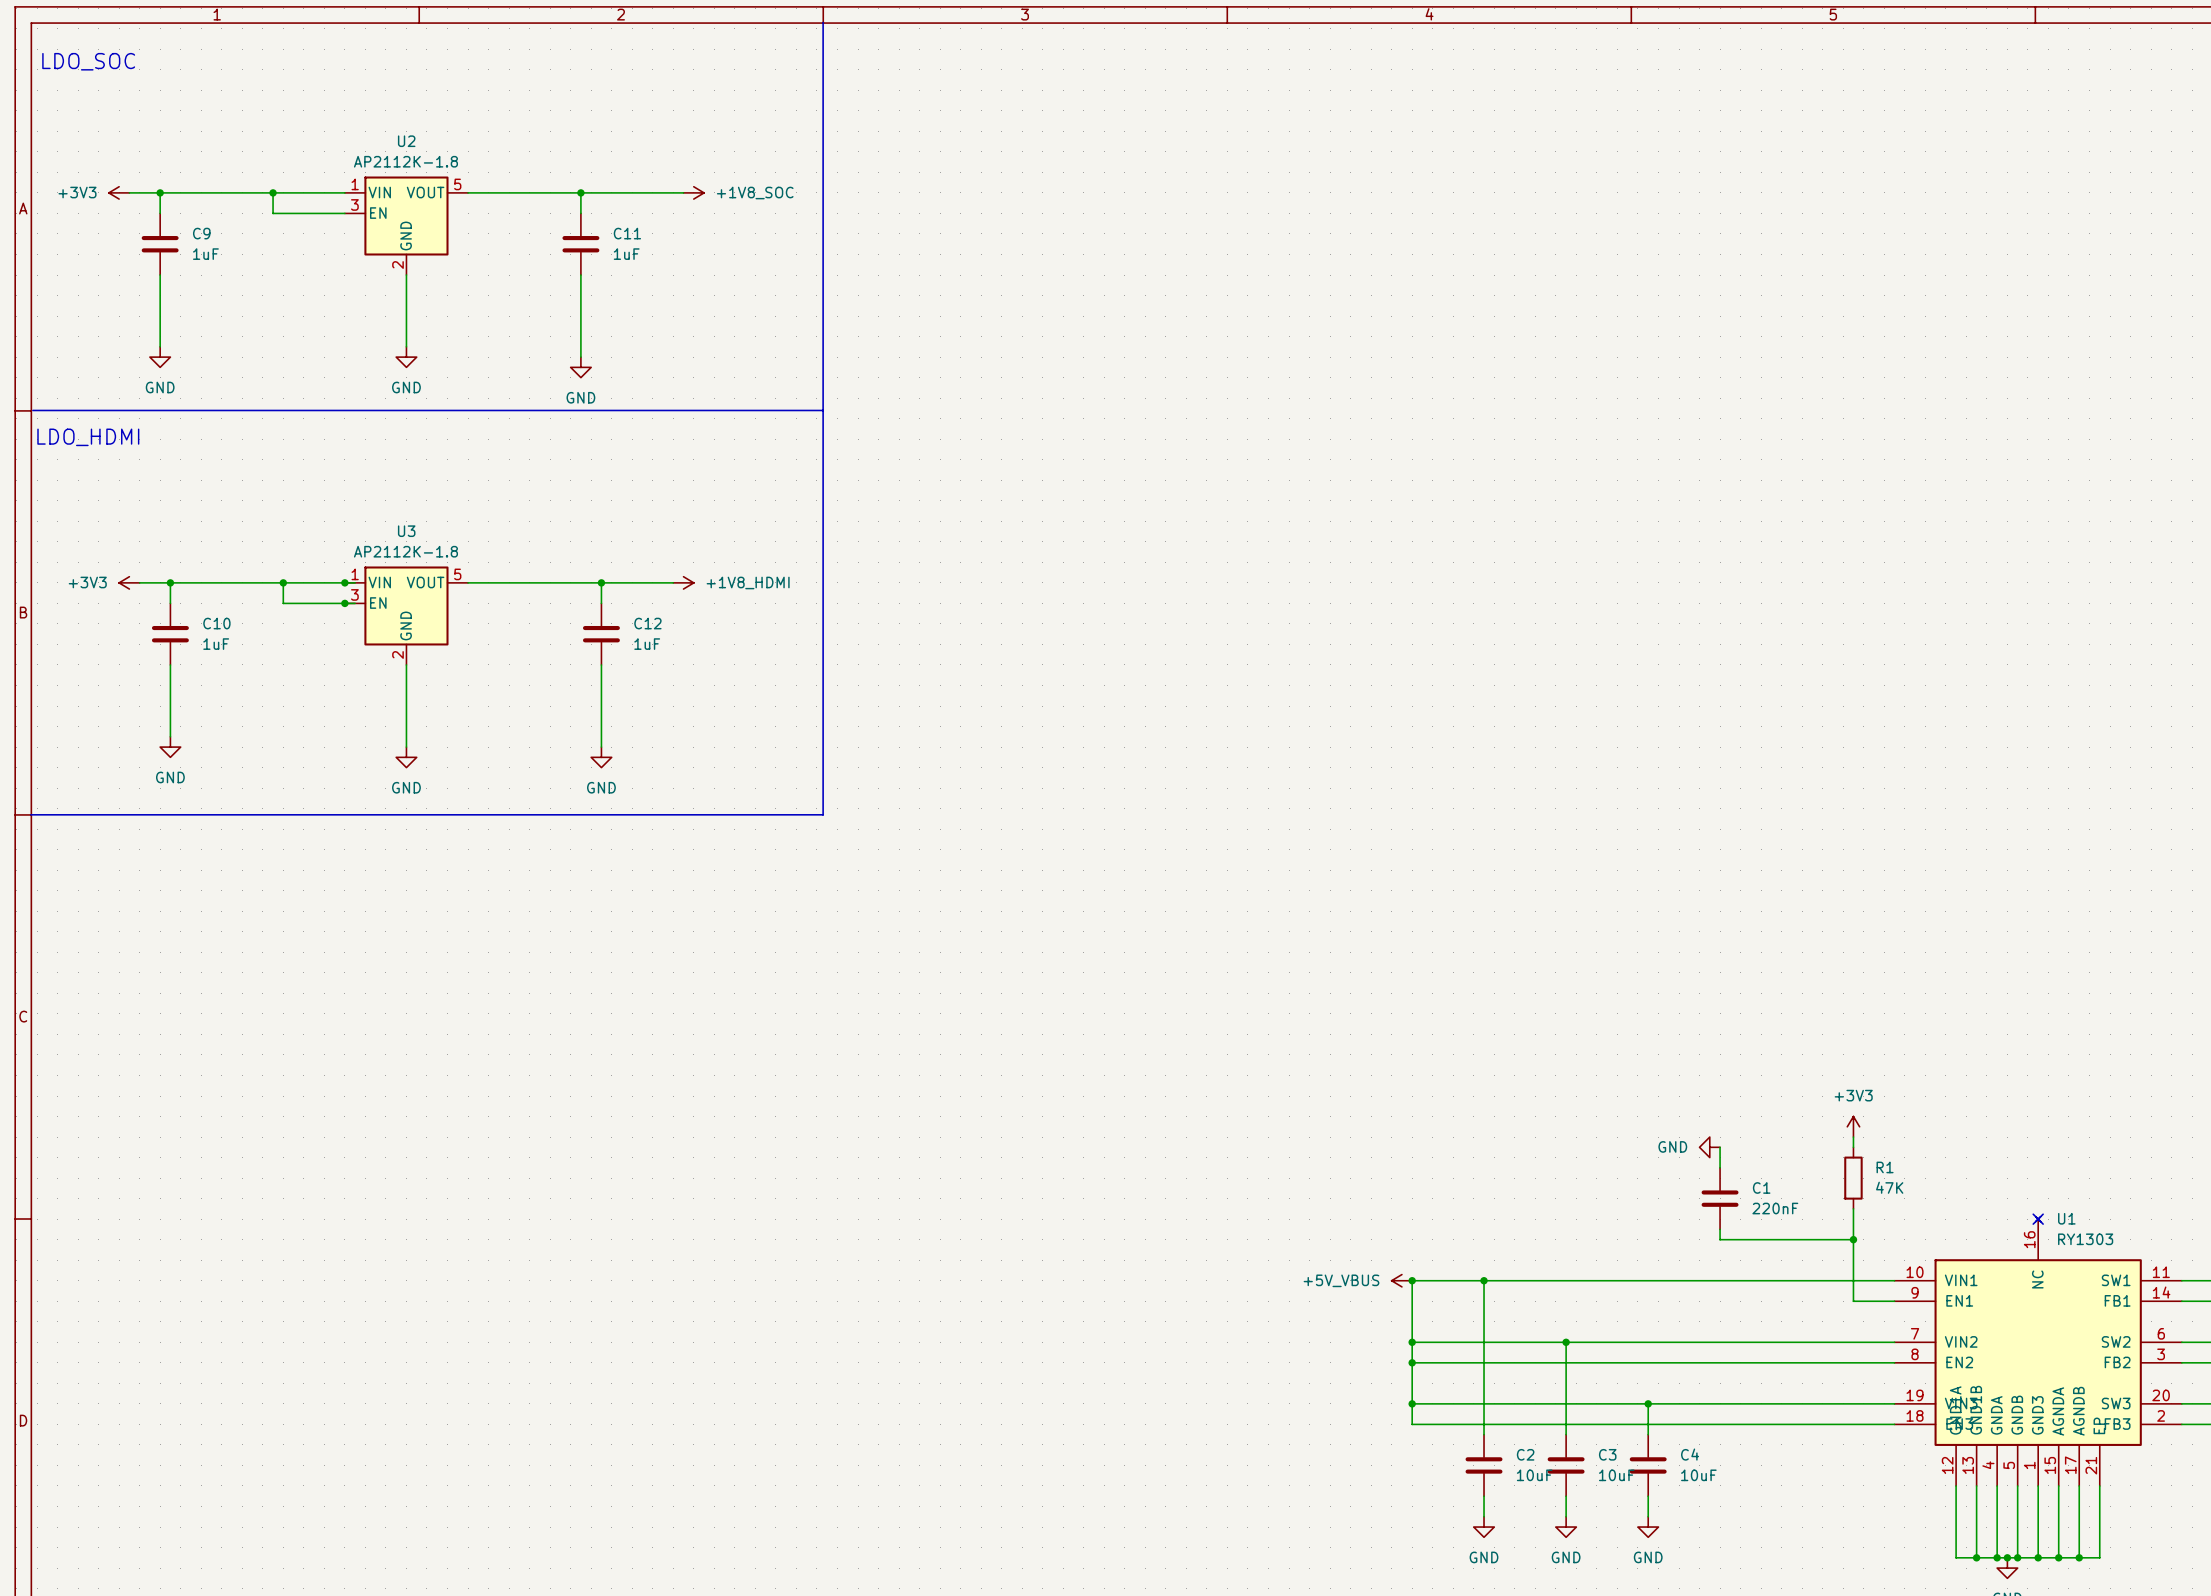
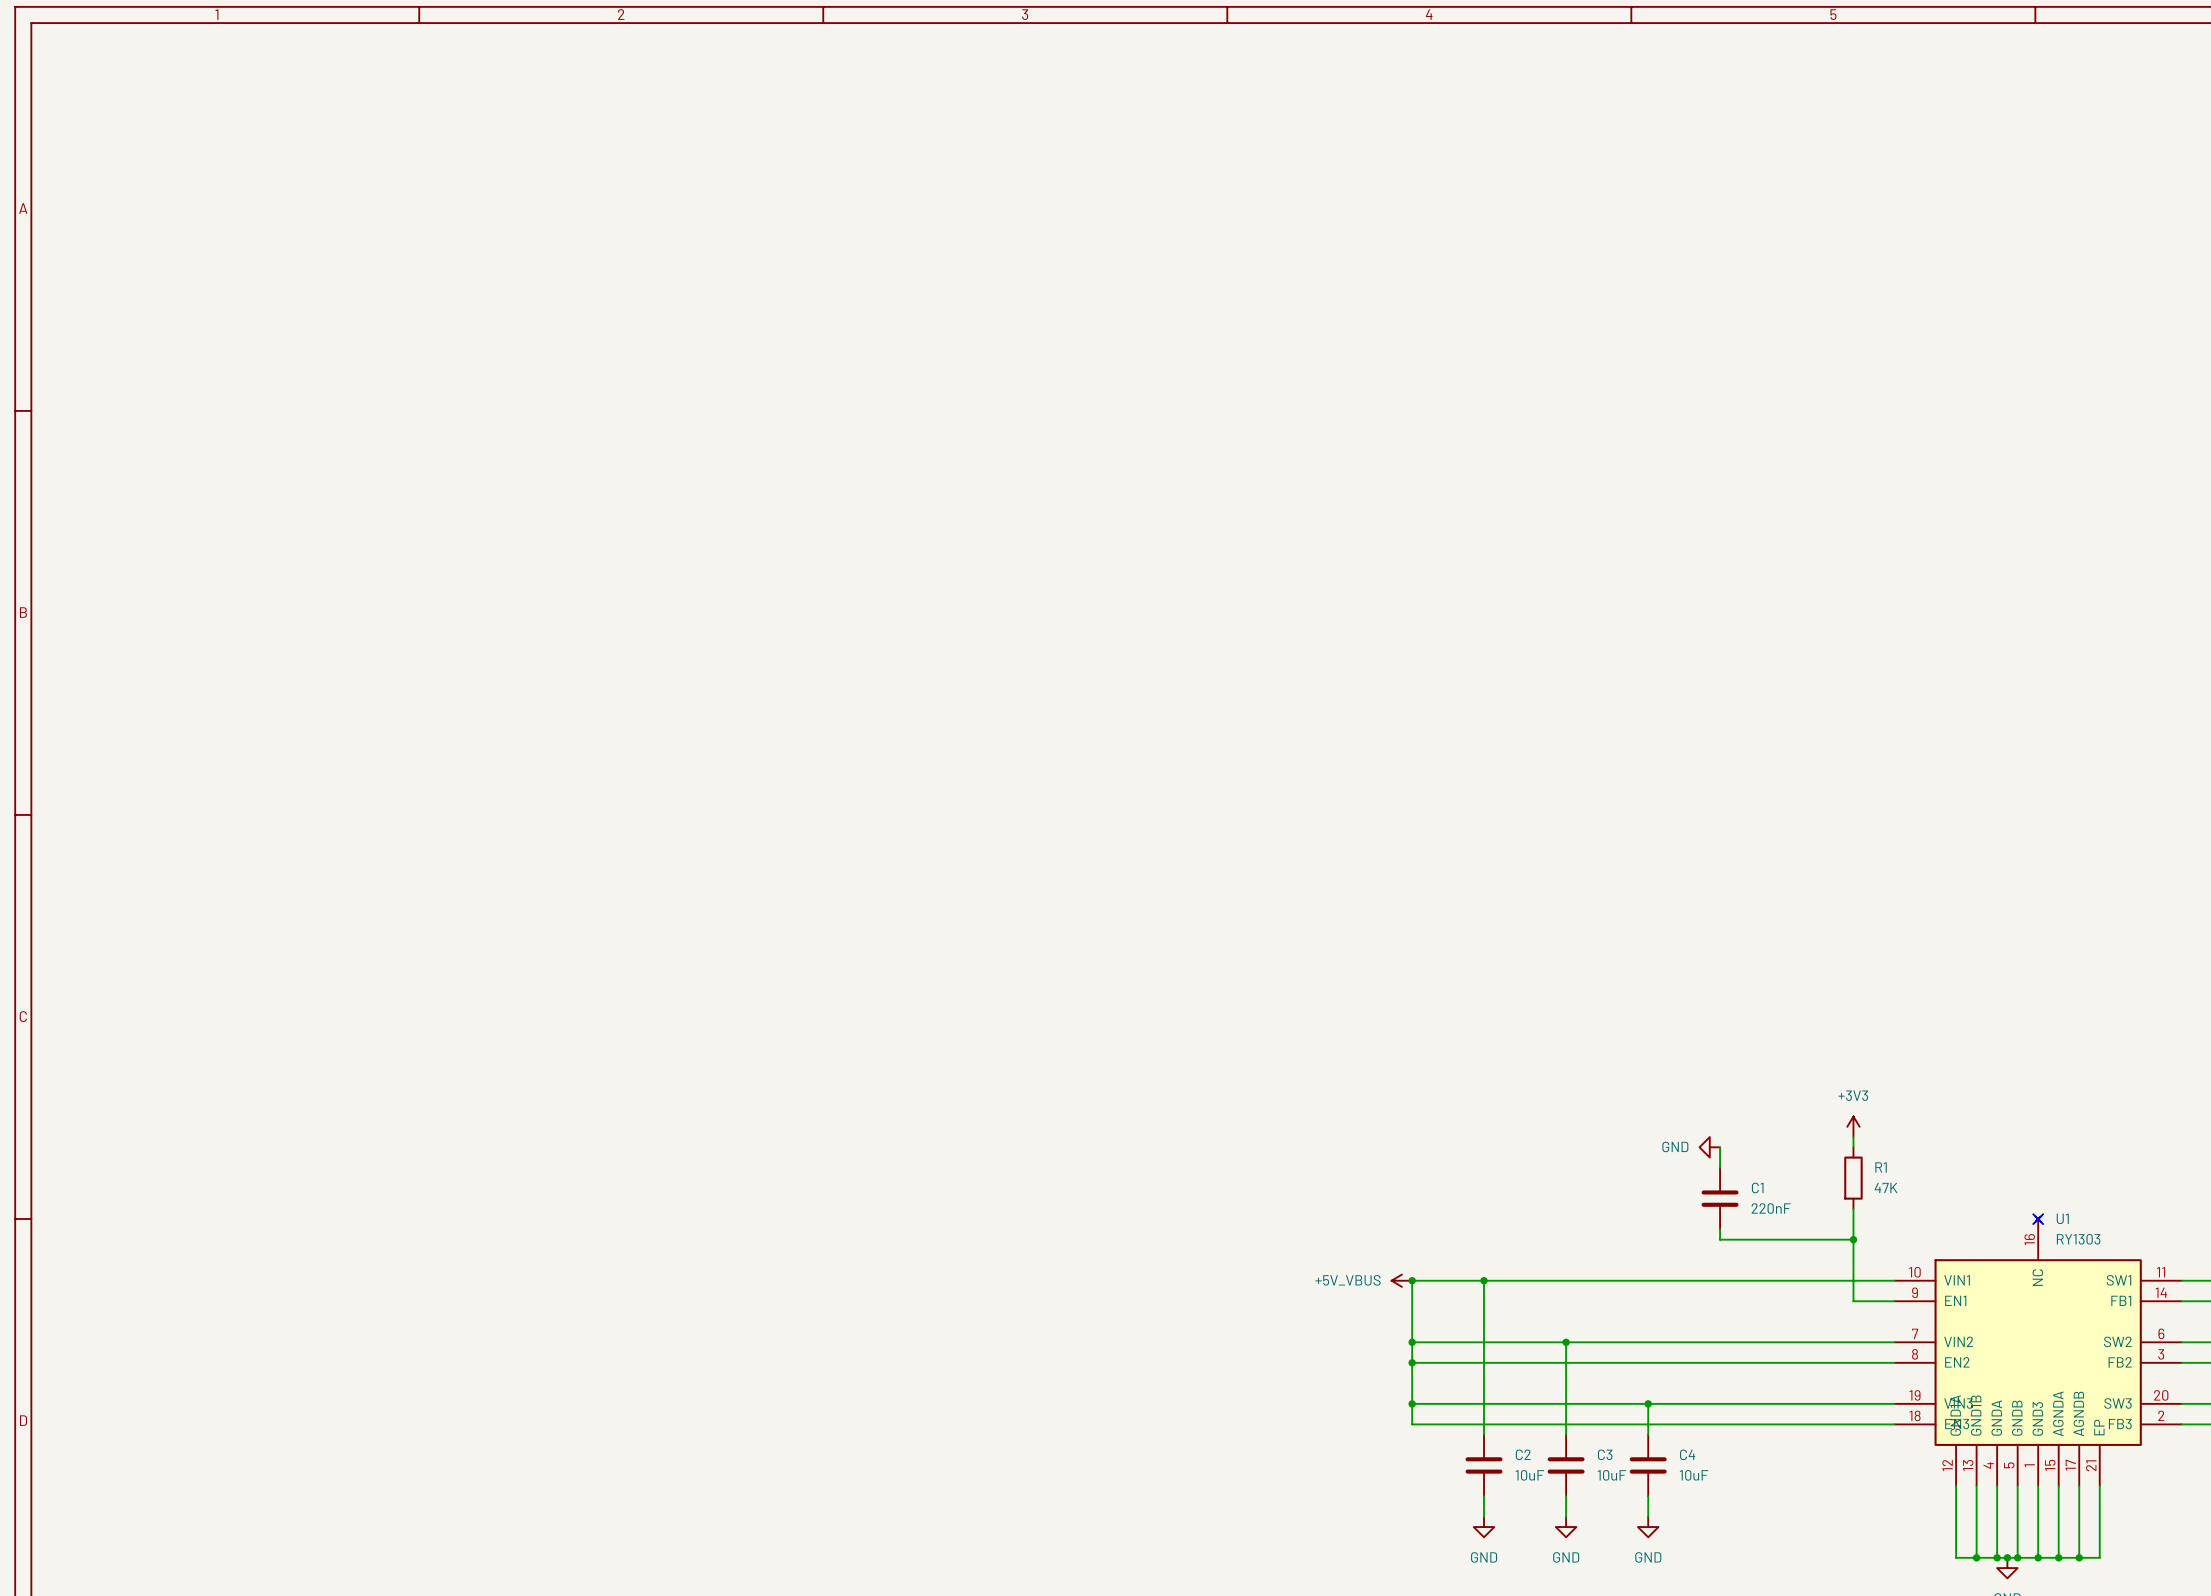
line: (823, 22) (823, 814) (30, 814) -> none
text: LDO_SOC (88, 61) -> none
power symbol: +3V3 (119, 192) -> none
wire: (129, 192) (344, 192) -> none
wire: (160, 192) (160, 213) -> none
junction: (160, 192) -> none
wire: (273, 192) (273, 213) (344, 213) -> none
junction: (273, 192) -> none
wire: (468, 192) (683, 192) -> none
wire: (580, 192) (580, 213) -> none
junction: (580, 192) -> none
power symbol: +1V8_SOC (693, 192) -> none
U2: AP2112K-1.8 (406, 225) -> none
C9: 1uF (160, 244) -> none
C11: 1uF (580, 244) -> none
wire: (160, 275) (160, 346) -> none
wire: (406, 275) (406, 346) -> none
wire: (580, 275) (580, 357) -> none
power symbol: GND (160, 357) -> none
power symbol: GND (406, 357) -> none
power symbol: GND (580, 367) -> none
line: (32, 410) (823, 410) -> none
text: LDO_HDMI (88, 437) -> none
power symbol: +3V3 (129, 582) -> none
wire: (139, 582) (355, 582) -> none
wire: (170, 582) (170, 603) -> none
junction: (170, 582) -> none
wire: (283, 582) (283, 603) (355, 603) -> none
junction: (283, 582) -> none
junction: (344, 582) -> none
wire: (468, 582) (673, 582) -> none
wire: (601, 582) (601, 603) -> none
junction: (601, 582) -> none
power symbol: +1V8_HDMI (683, 582) -> none
junction: (344, 603) -> none
U3: AP2112K-1.8 (406, 615) -> none
C10: 1uF (170, 634) -> none
C12: 1uF (601, 634) -> none
wire: (170, 664) (170, 736) -> none
wire: (406, 664) (406, 747) -> none
wire: (601, 664) (601, 747) -> none
power symbol: GND (170, 747) -> none
power symbol: GND (406, 757) -> none
power symbol: GND (601, 757) -> none

